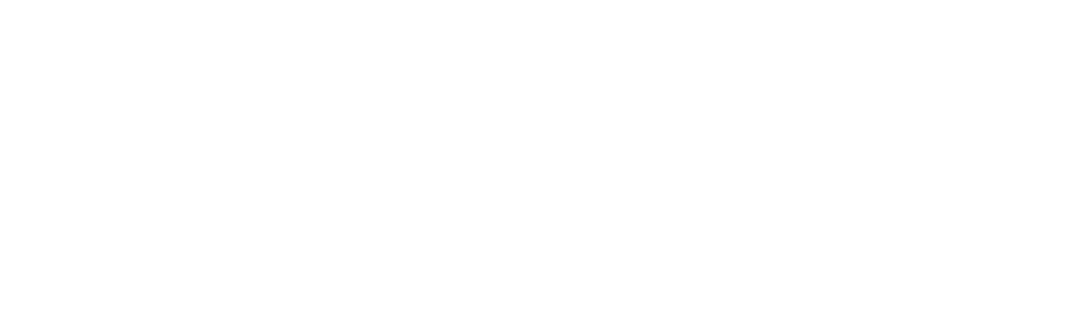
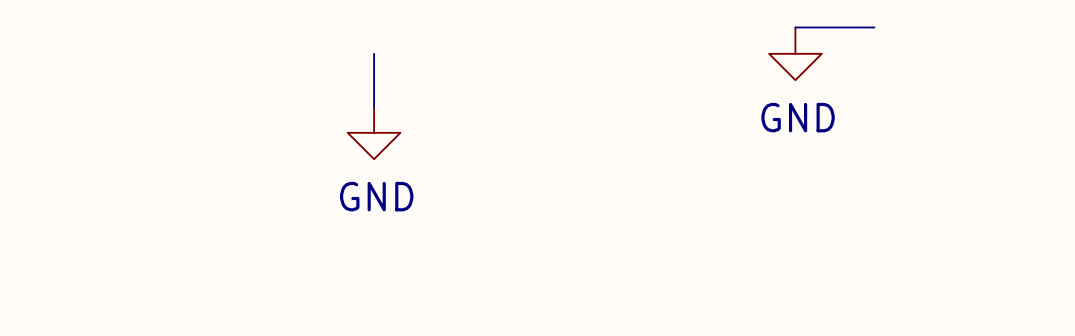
wire: none -> (795, 27) (874, 27)
wire: none -> (374, 53) (374, 106)
power symbol: none -> GND (795, 53)
power symbol: none -> GND (374, 132)

